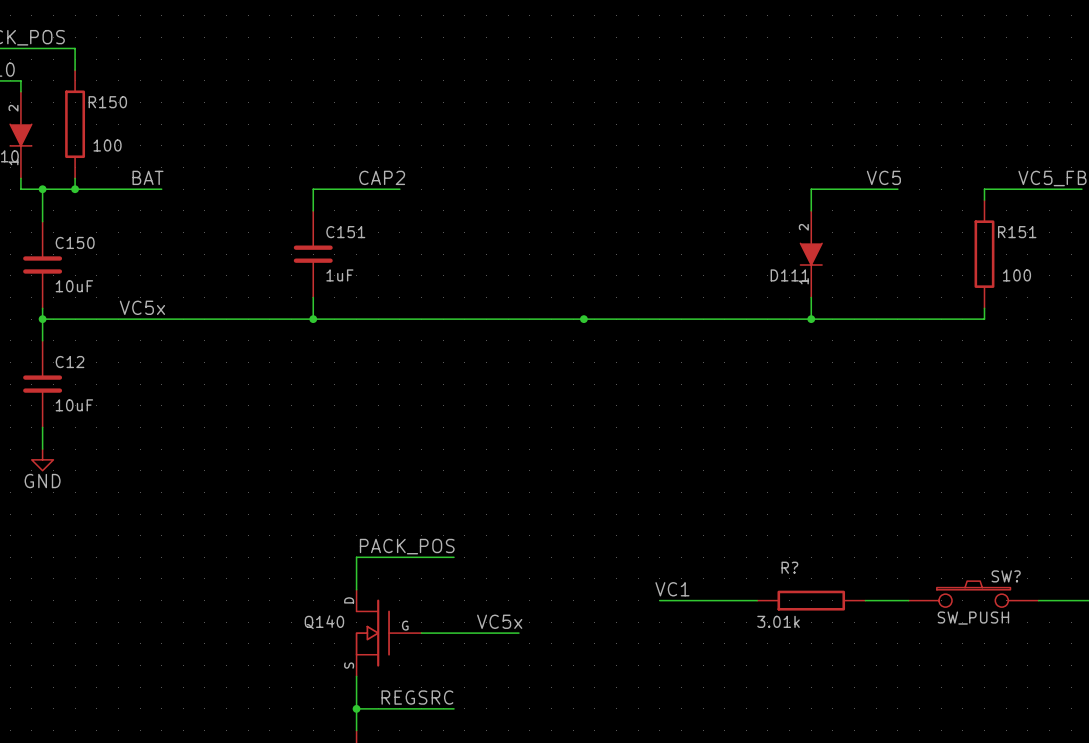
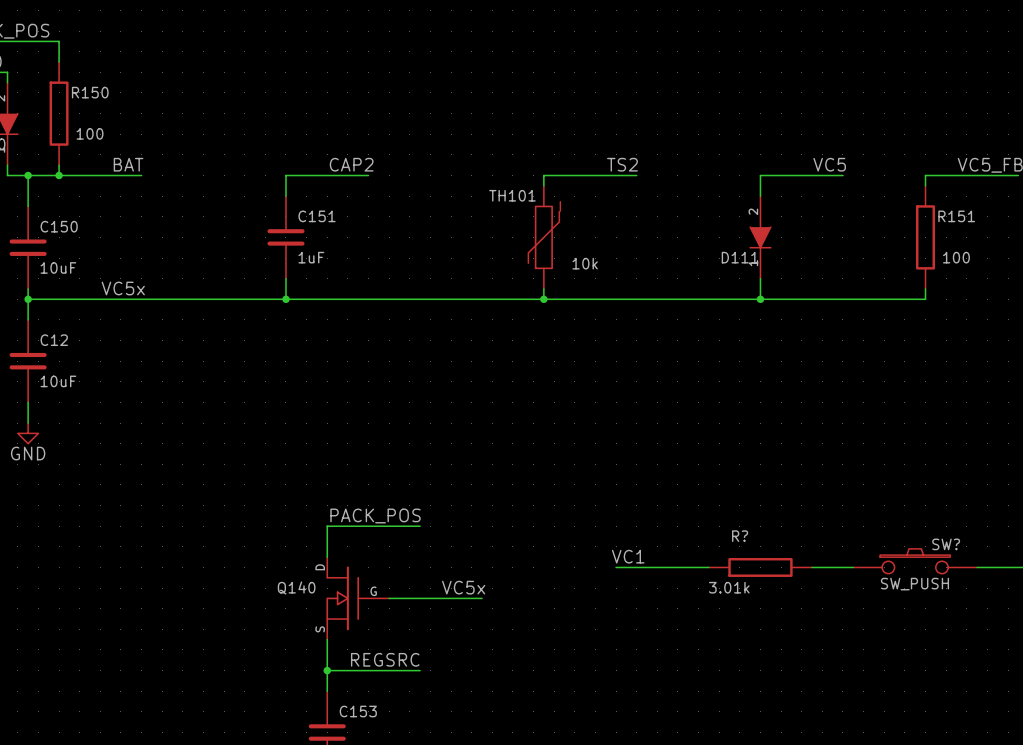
label: none -> TS2 (622, 164)
wire: none -> (636, 175) (543, 175) (543, 185)
TH101: none -> 10k (543, 237)
wire: none -> (543, 288) (543, 299)

